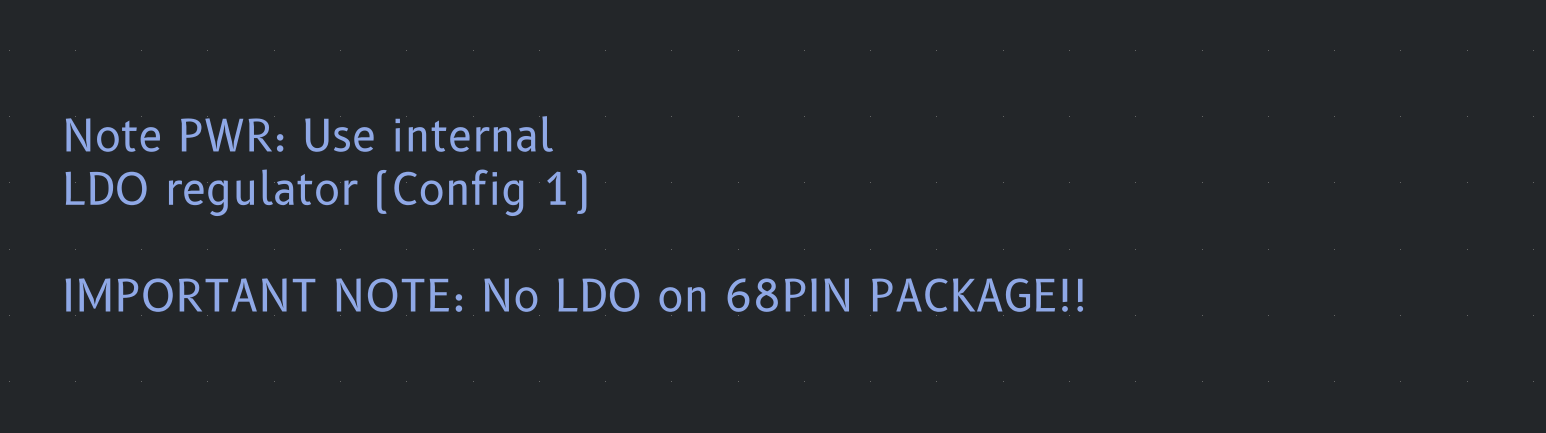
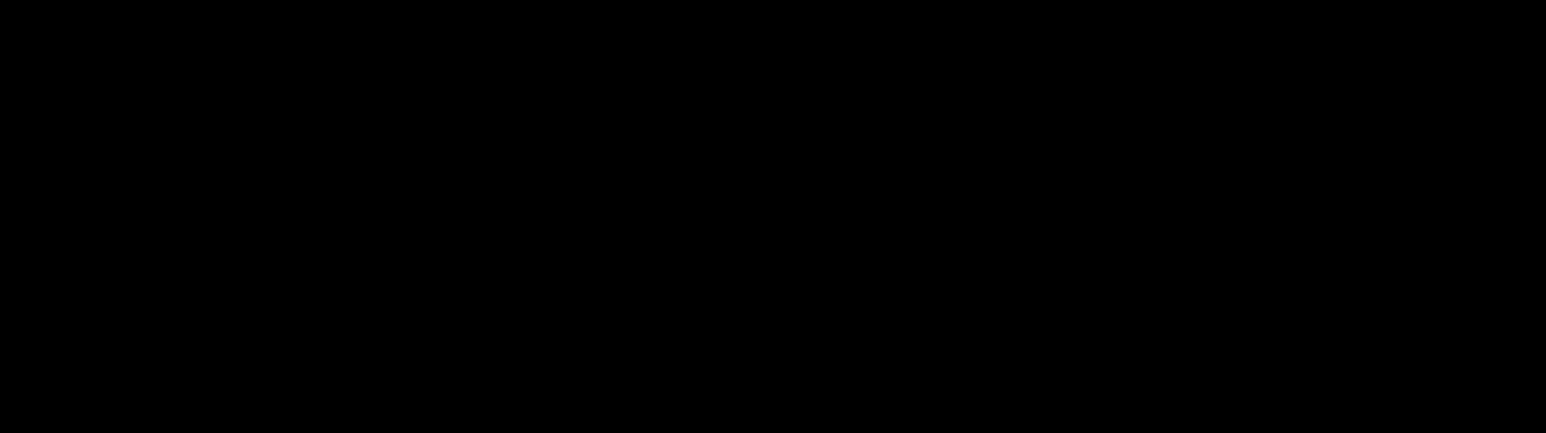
text: Note PWR: Use internal (309, 133) -> none
text: LDO regulator (Config 1) (326, 192) -> none
text: IMPORTANT NOTE: No LDO on 68PIN PACKAGE!! (574, 295) -> none

